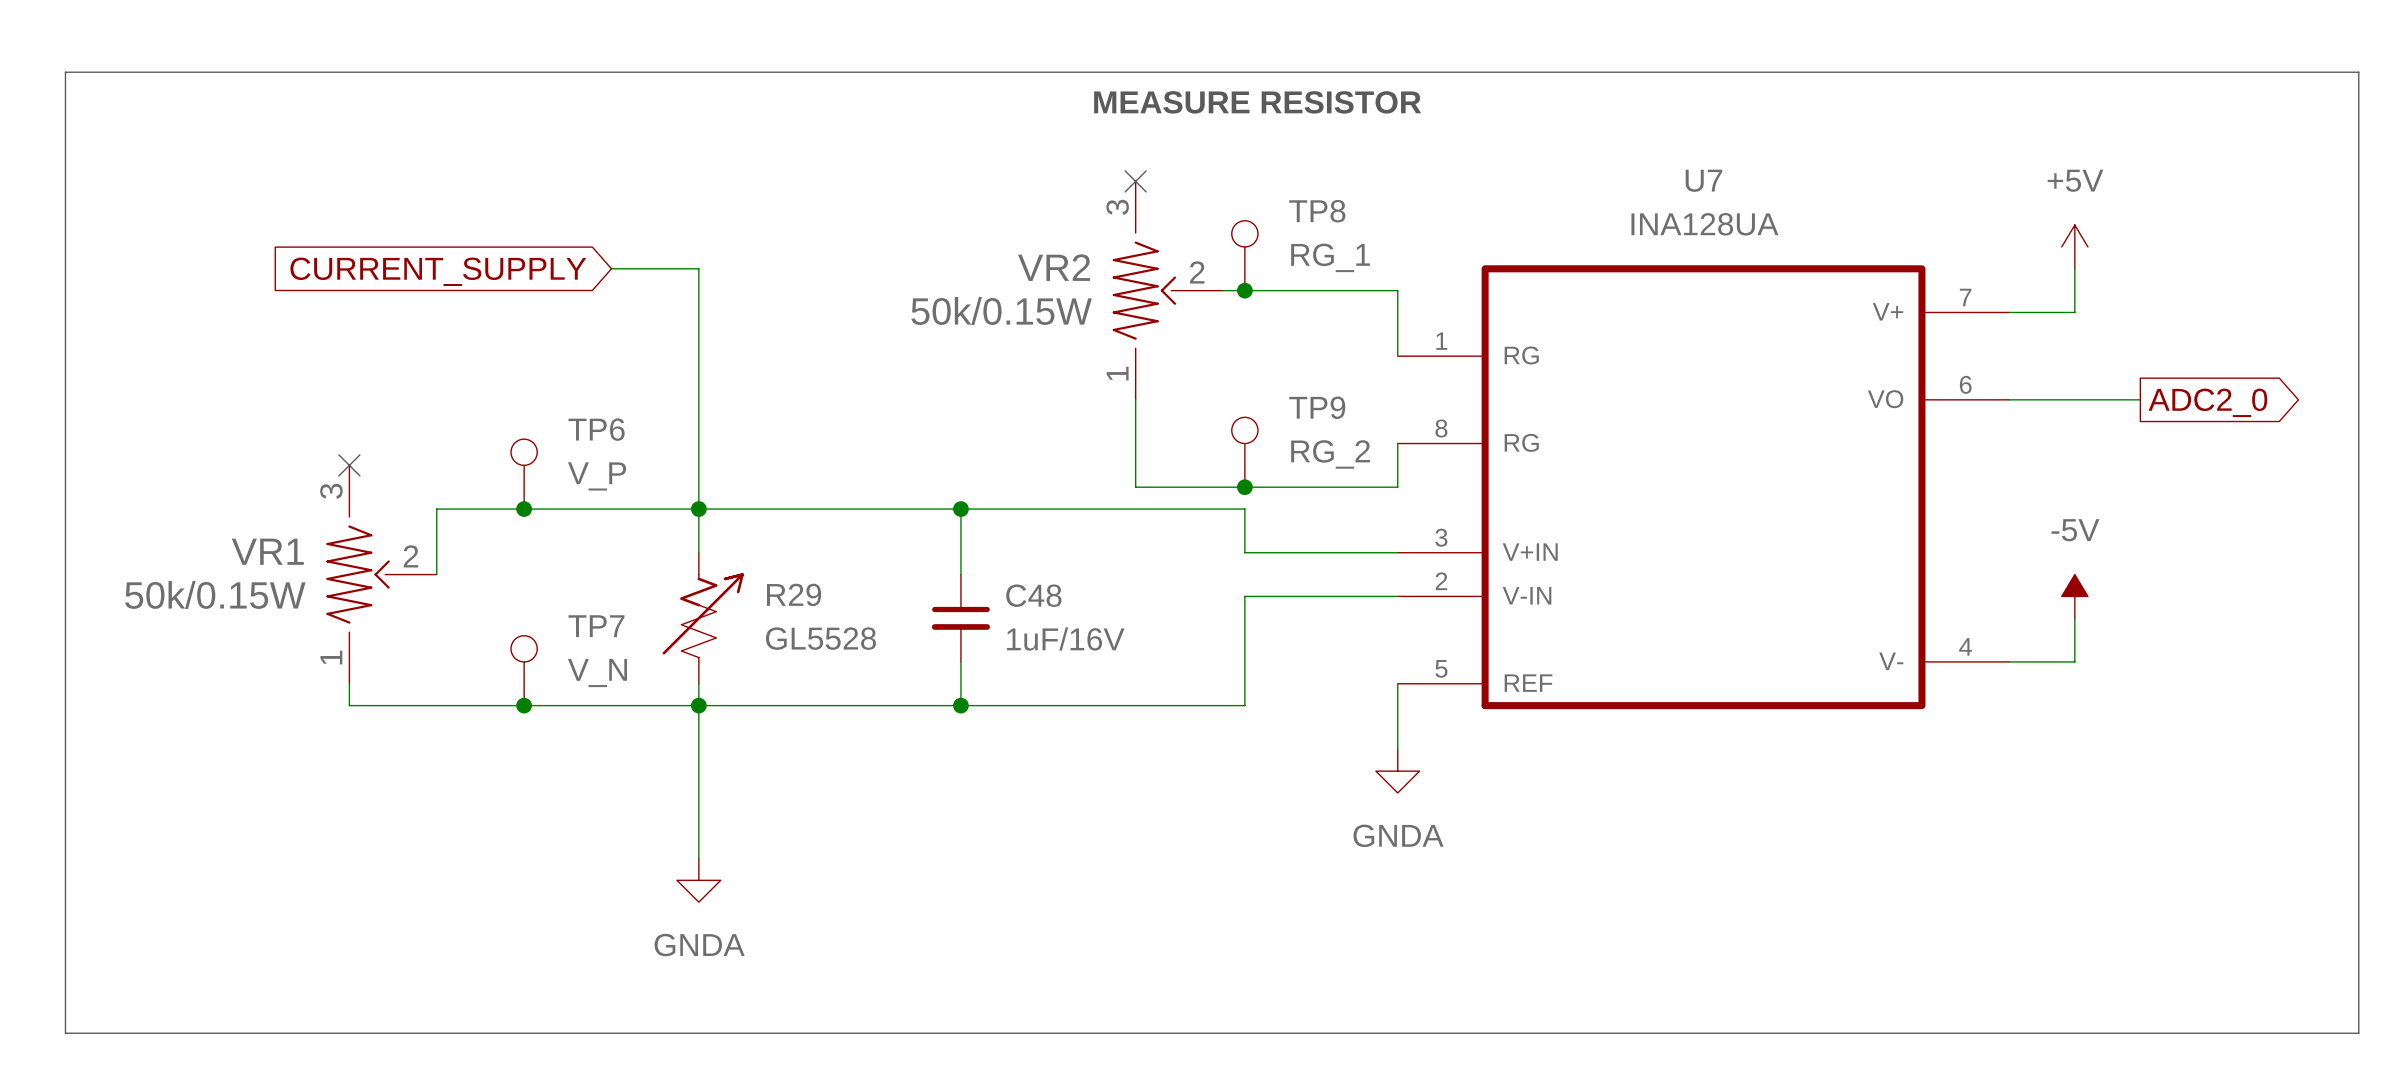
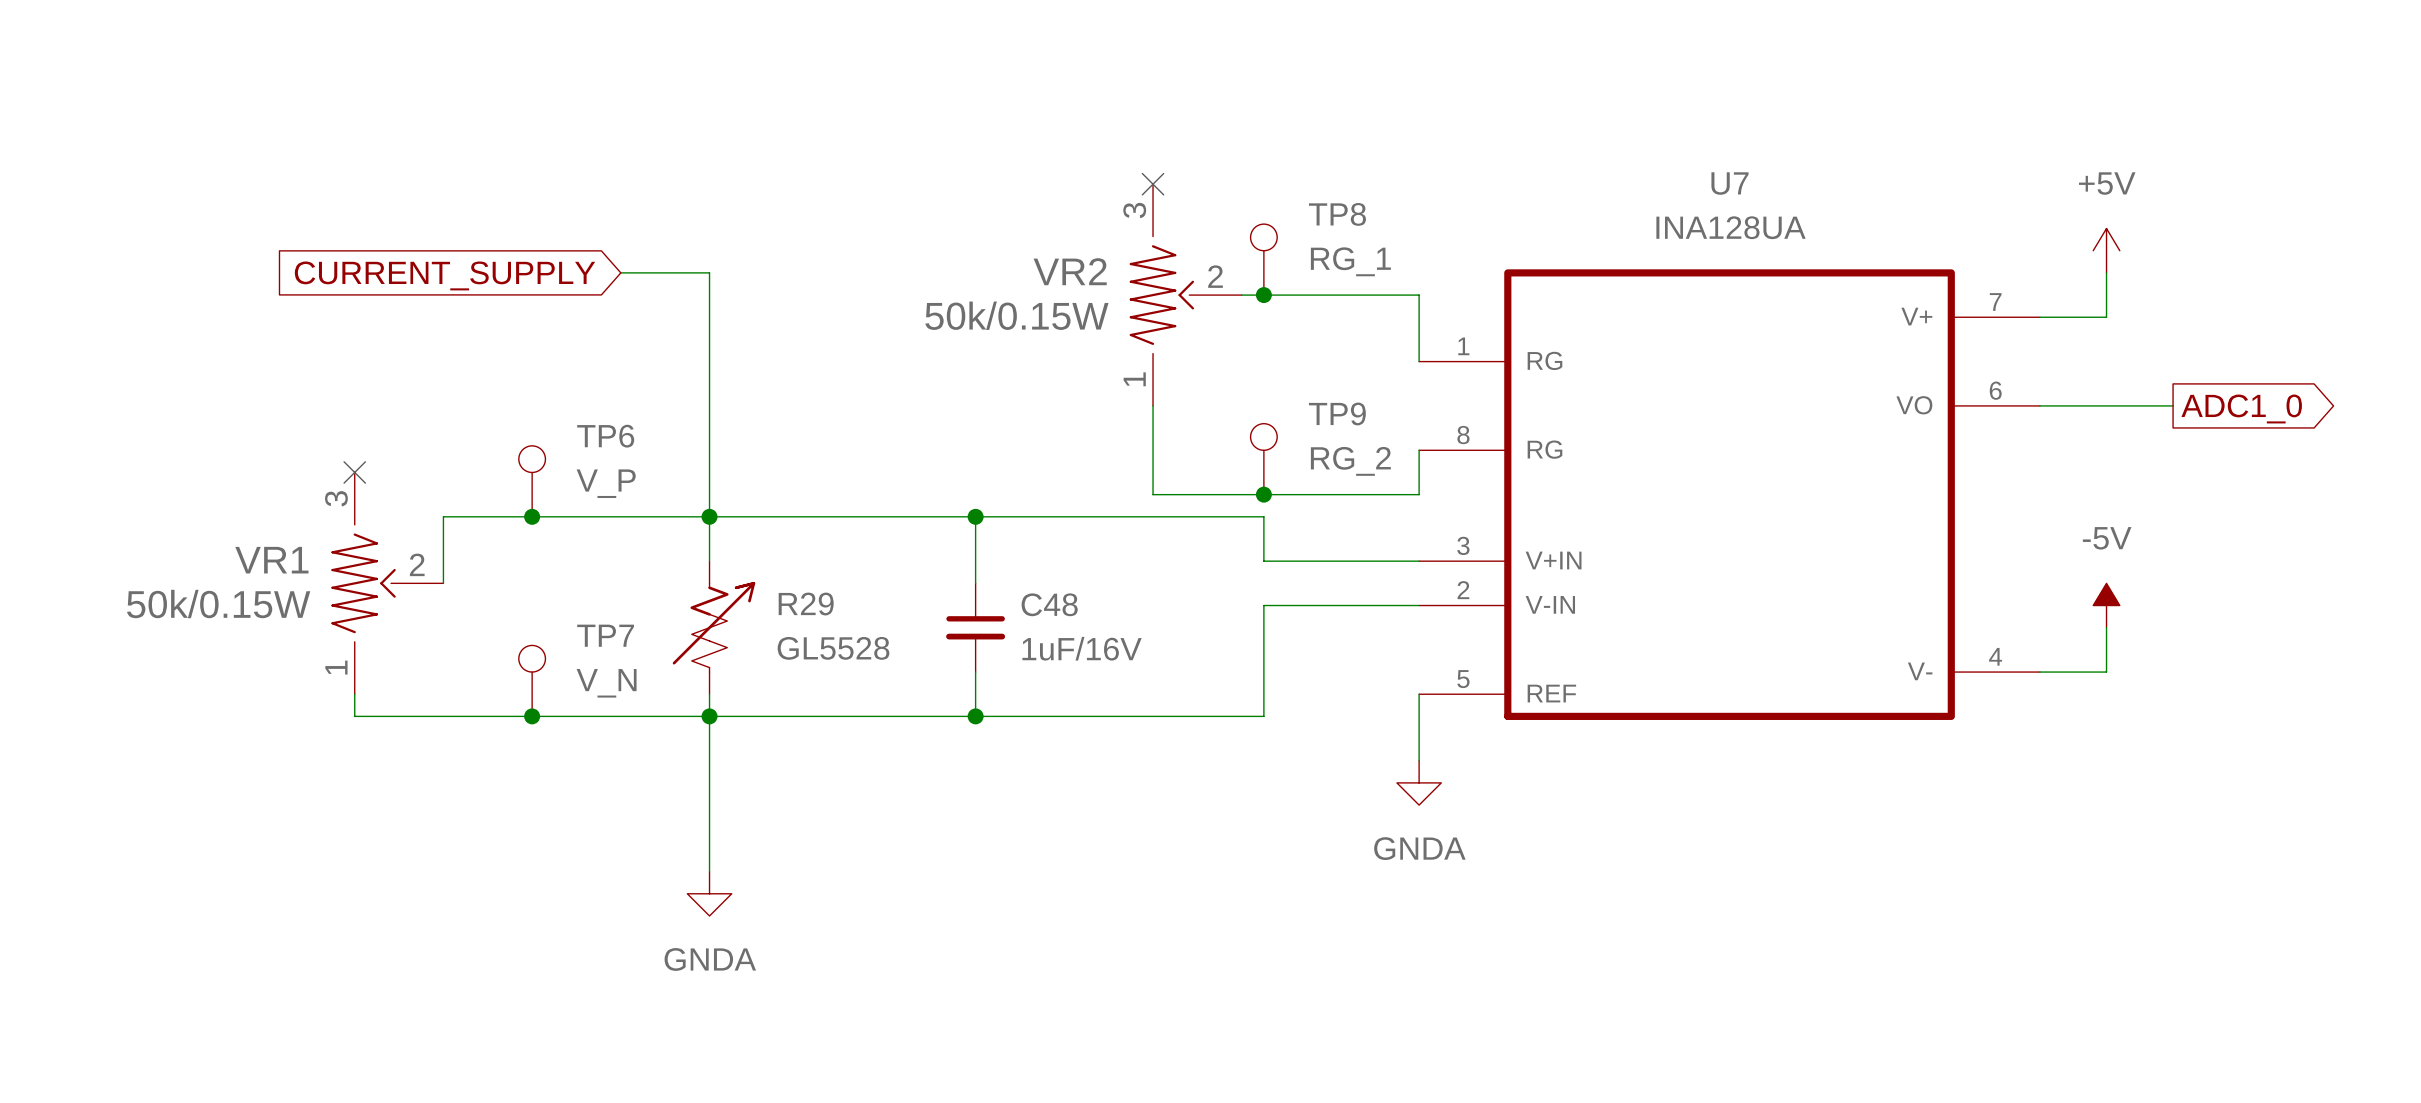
line: (65, 72) (2358, 72) (2358, 1033) (65, 1033) (65, 72) -> none
text: MEASURE RESISTOR (1257, 102) -> none
global label: ADC2_0 (2207, 402) -> ADC1_0 (2241, 408)

